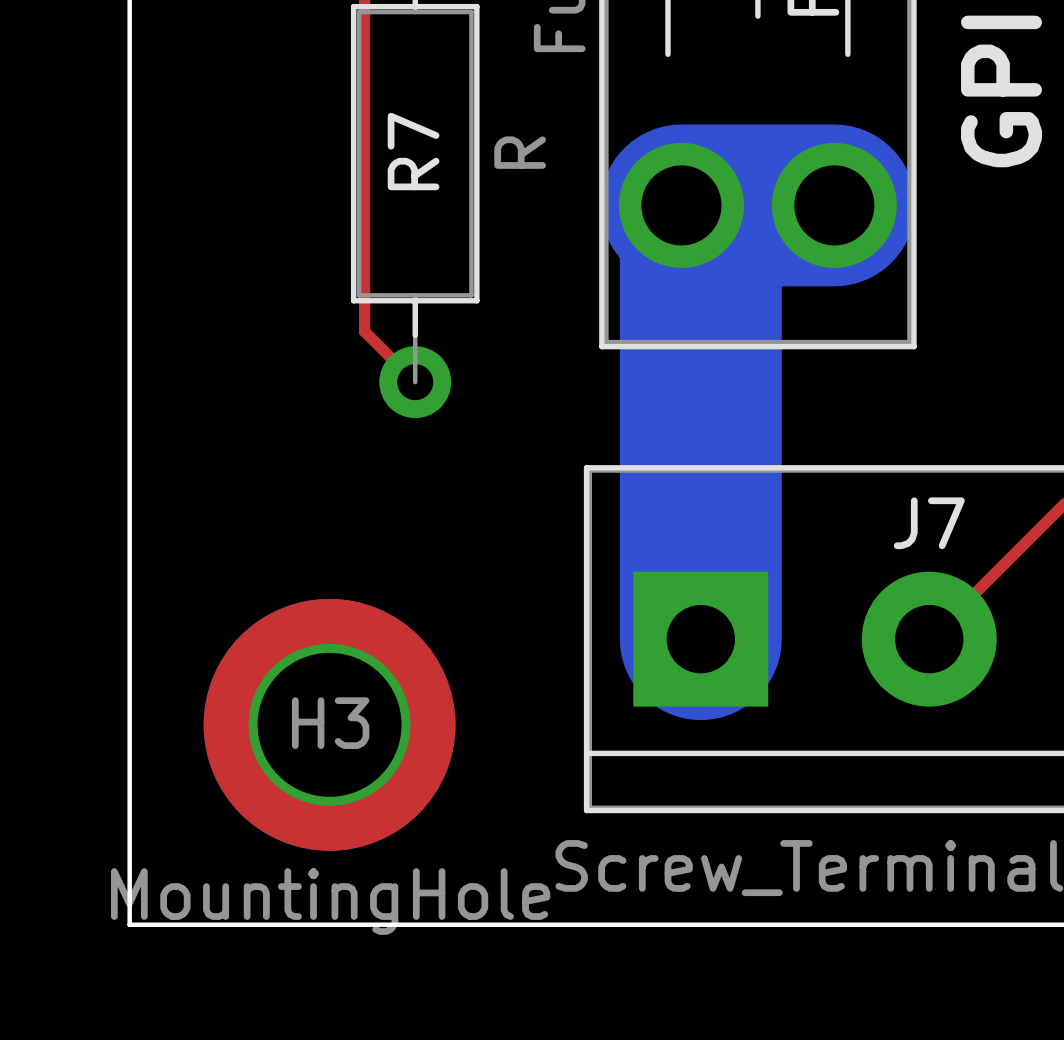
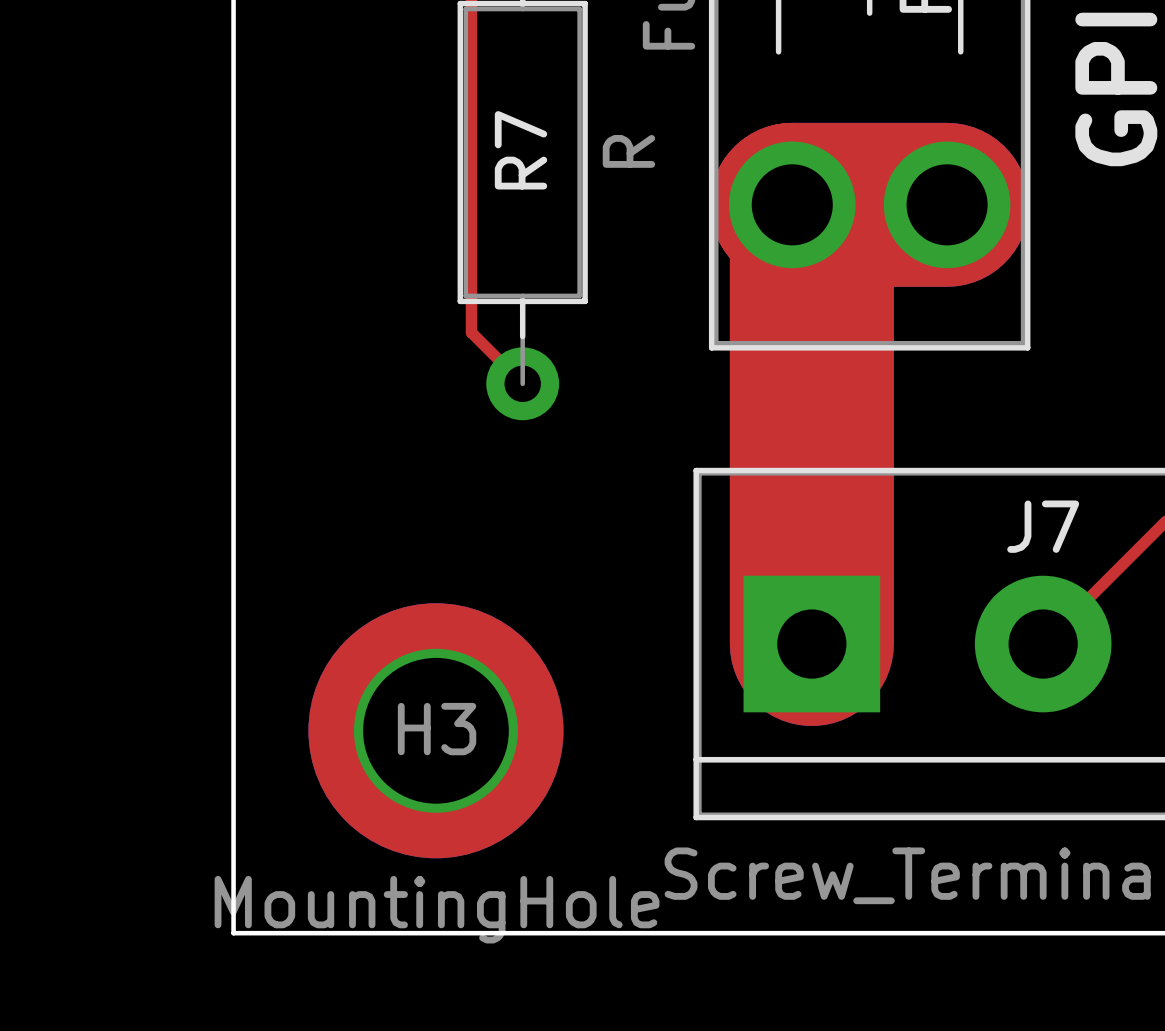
top track: none -> (947, 204) (792, 204) (811, 224) (811, 644)

